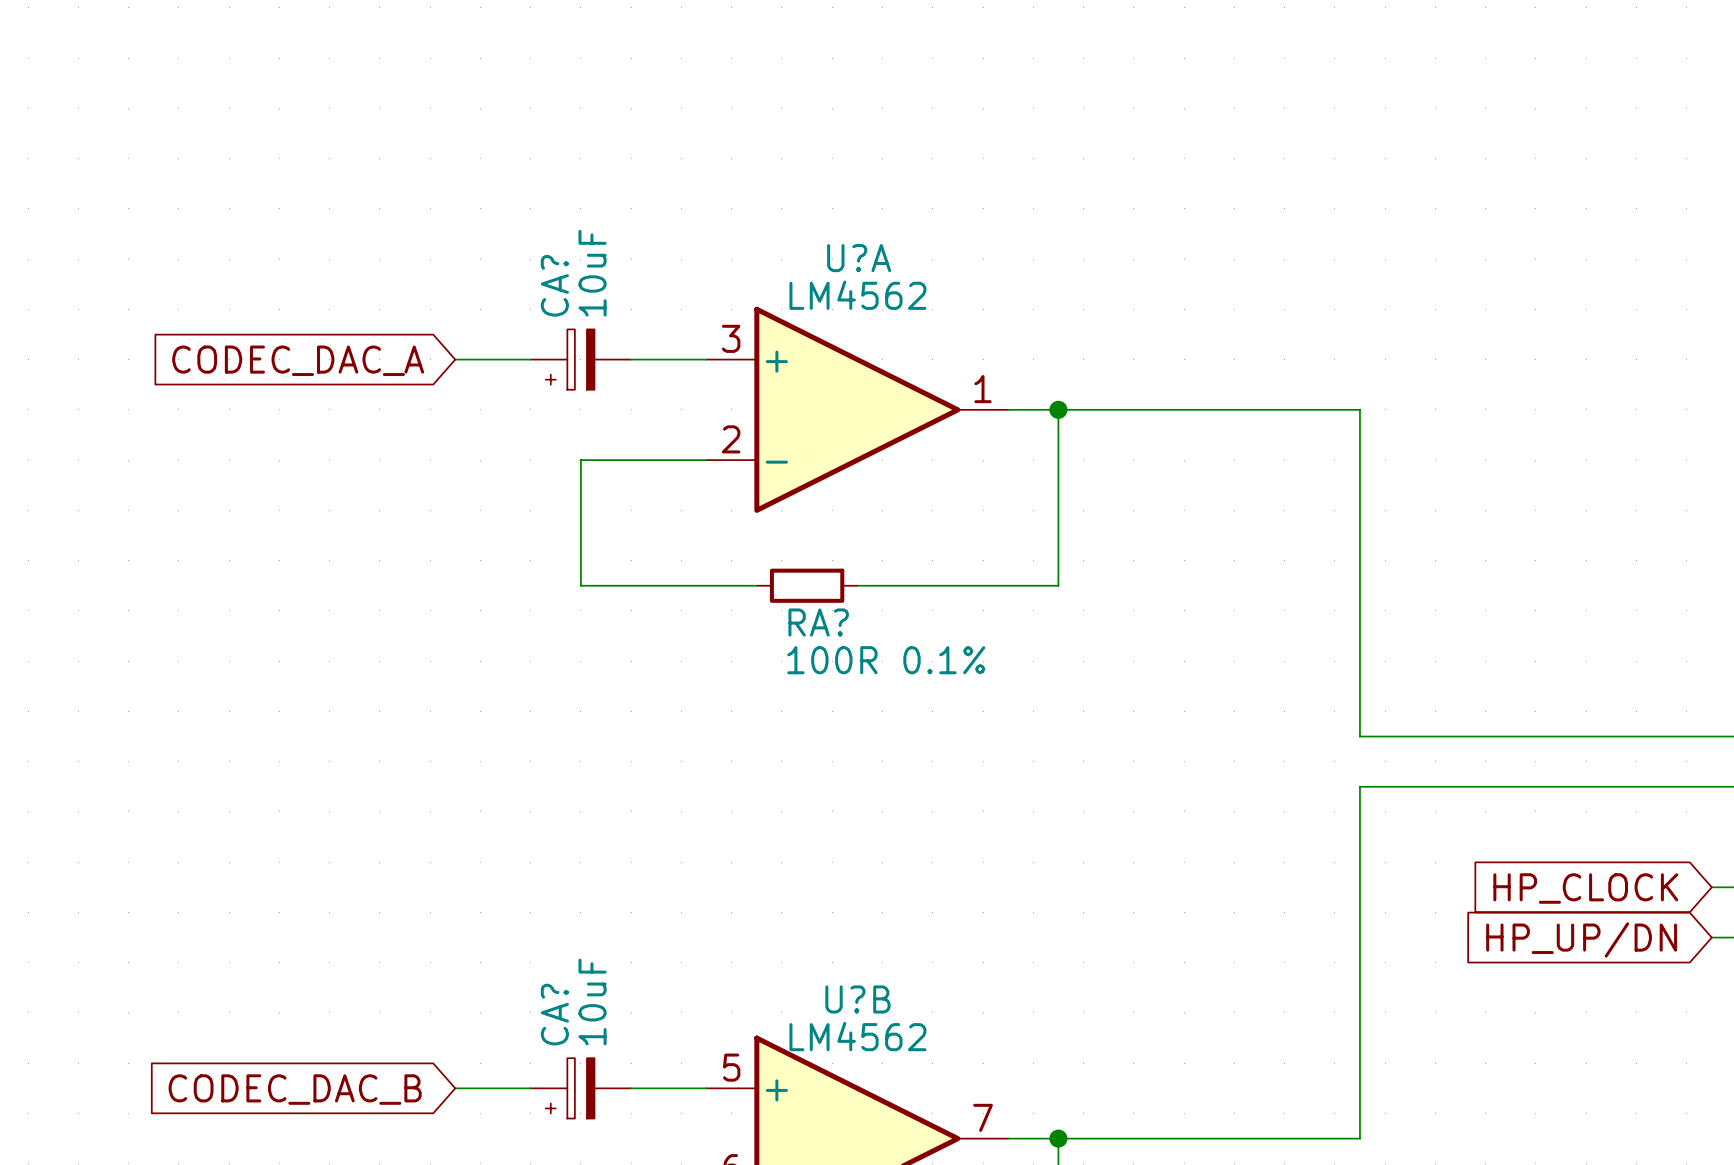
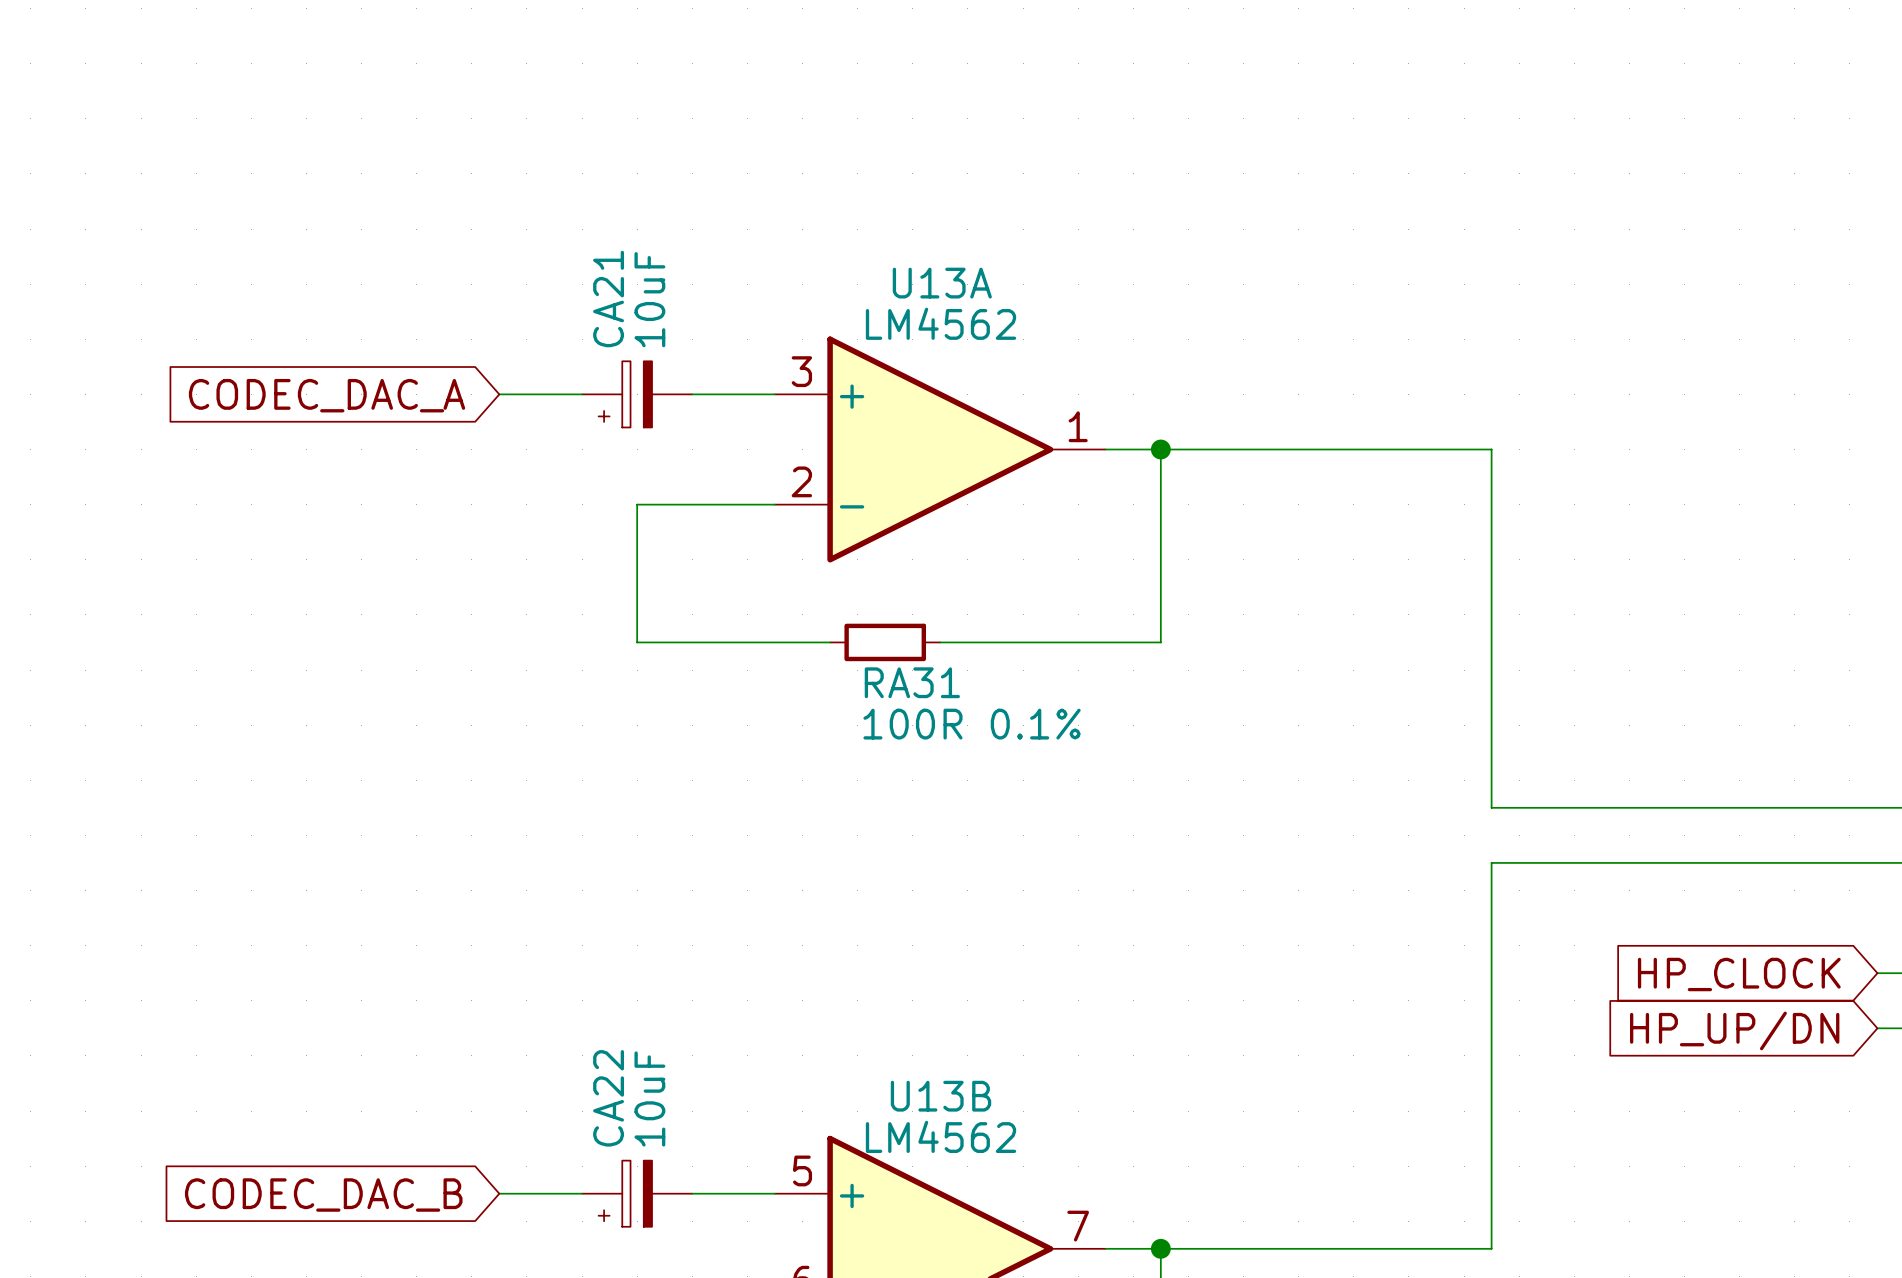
U?A name: U?A (859, 258) -> U13A (942, 283)
CA? name: CA? (554, 285) -> CA21 (608, 299)
RA? name: RA? (818, 622) -> RA31 (912, 682)
U?B name: U?B (857, 999) -> U13B (940, 1096)
CA? name: CA? (554, 1014) -> CA22 (608, 1098)

